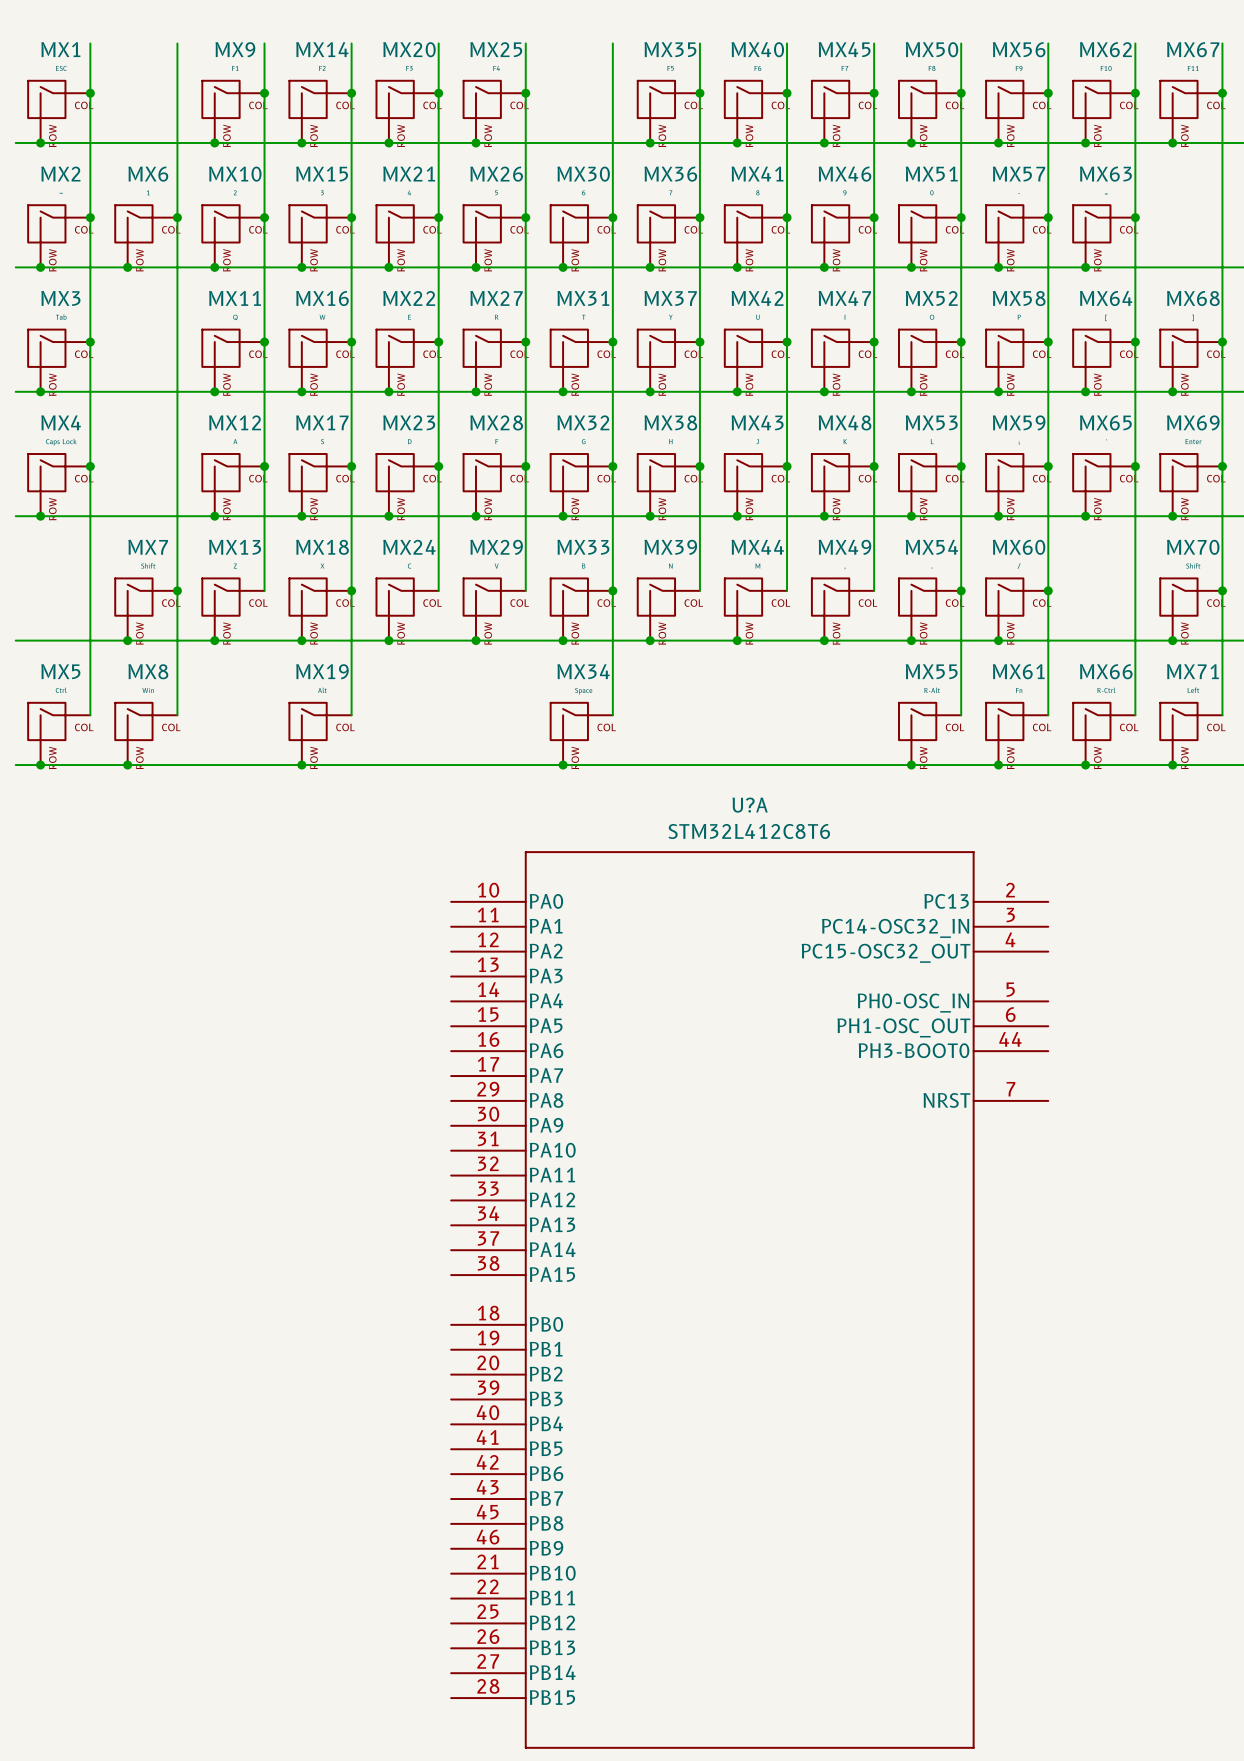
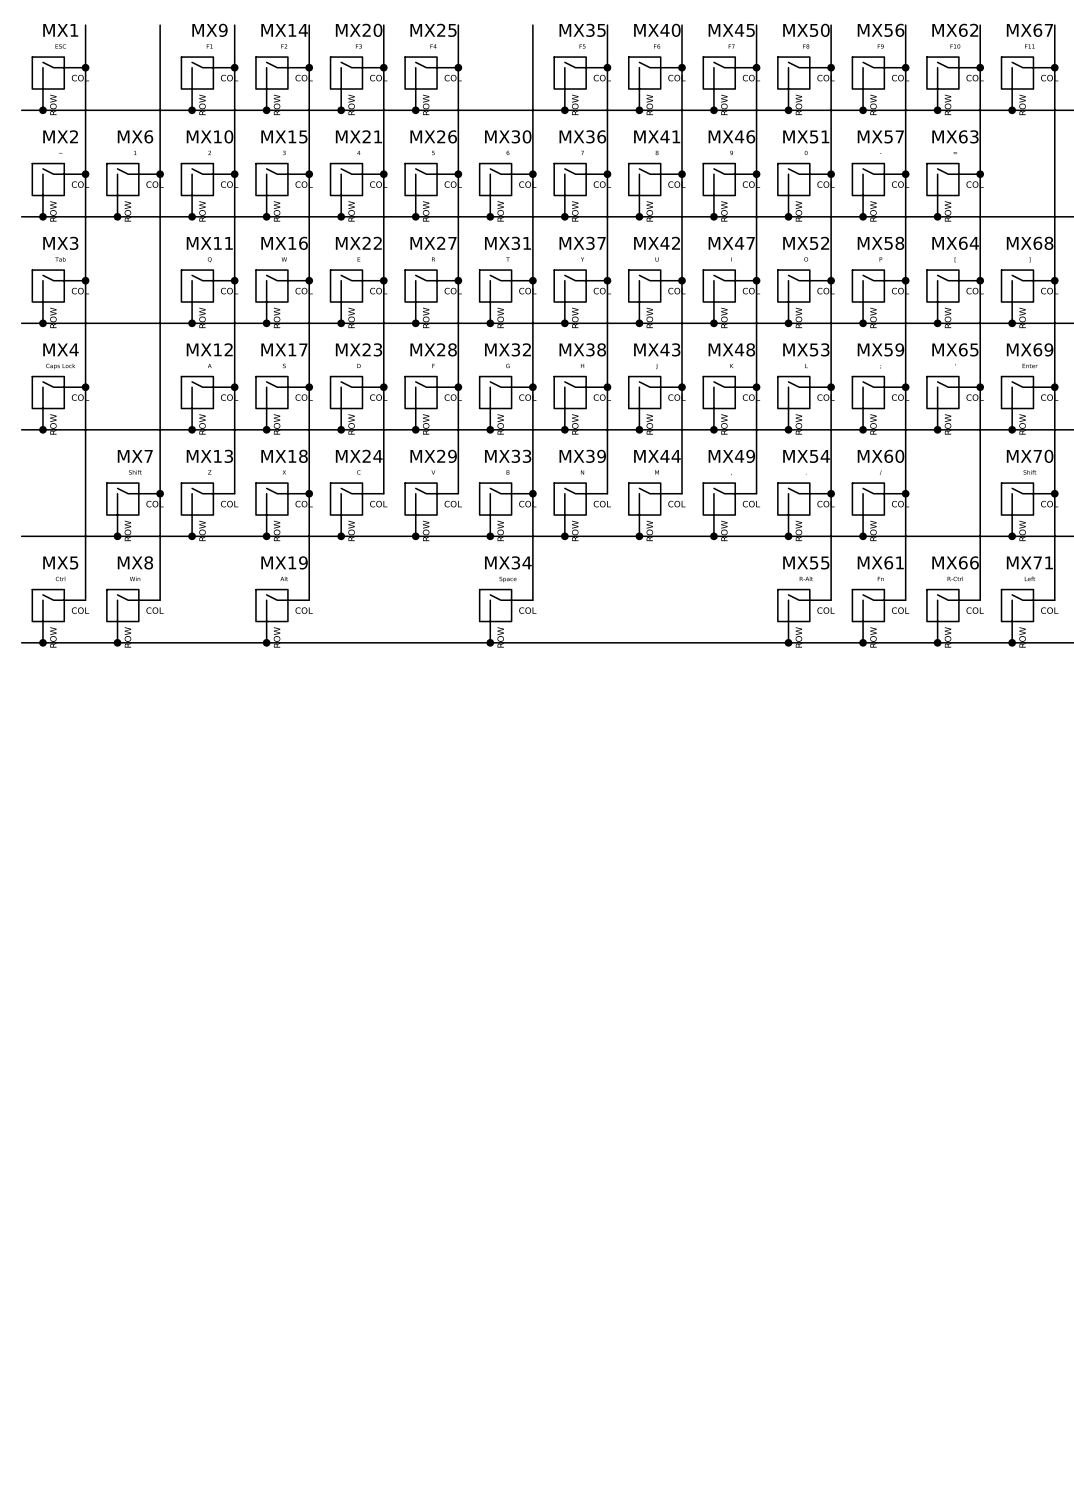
U?A: STM32L412C8T6 (749, 1299) -> none

